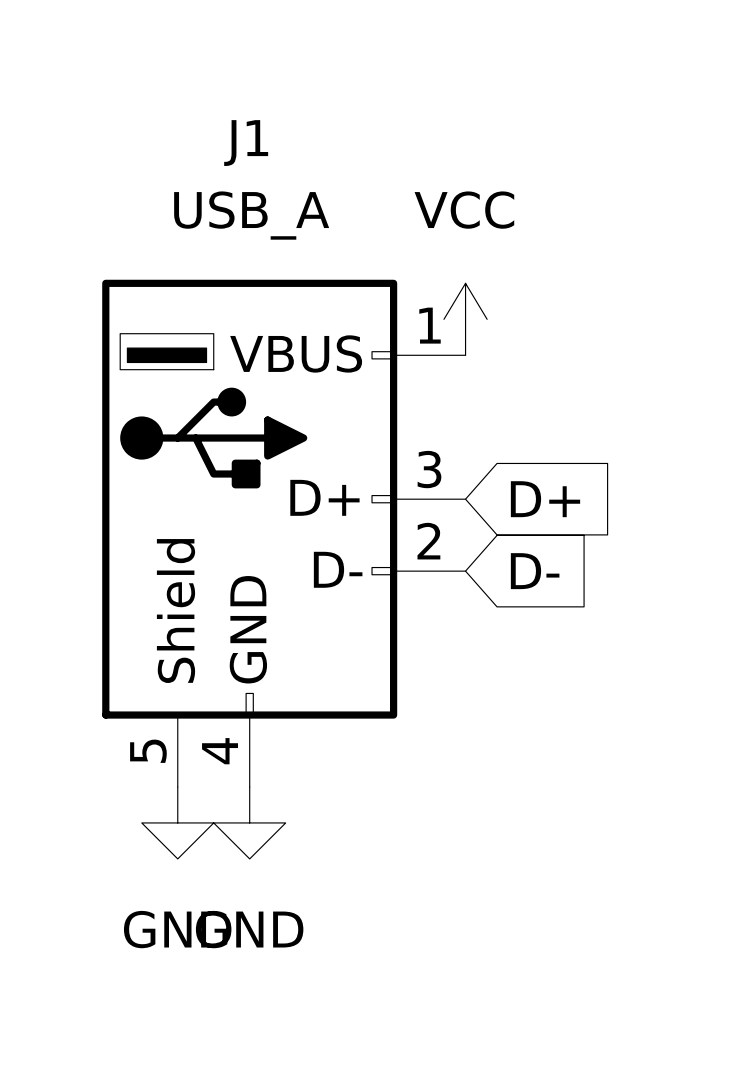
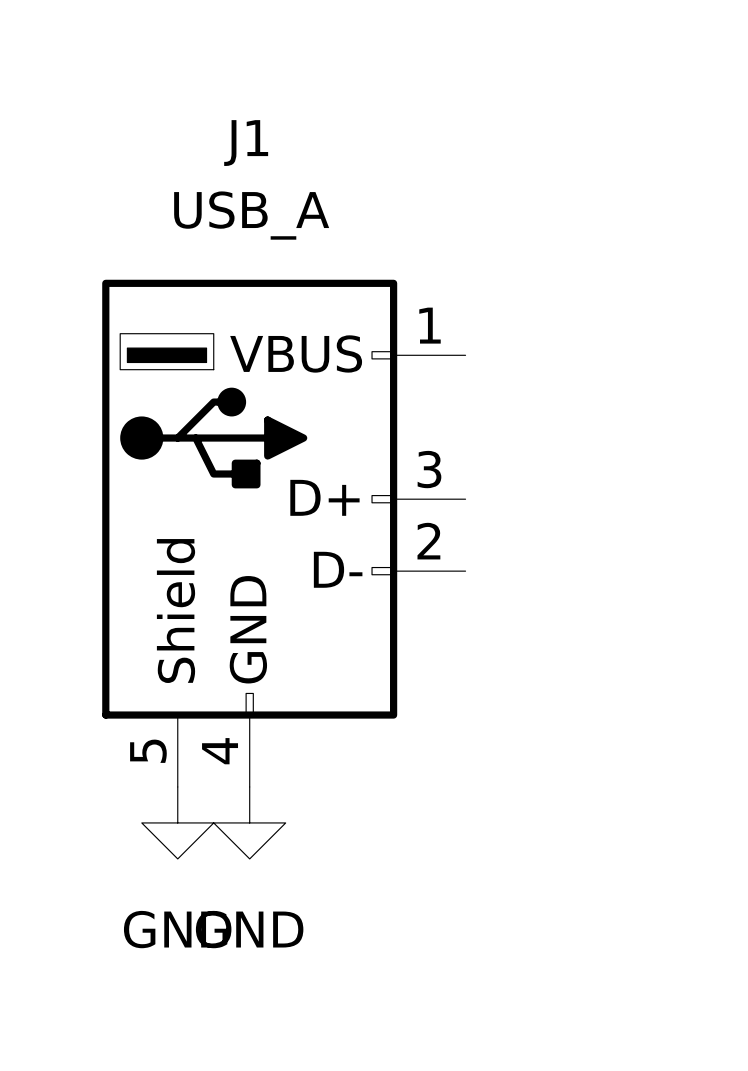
power symbol: VCC (465, 319) -> none
global label: D+ (545, 499) -> none
global label: D- (535, 571) -> none

